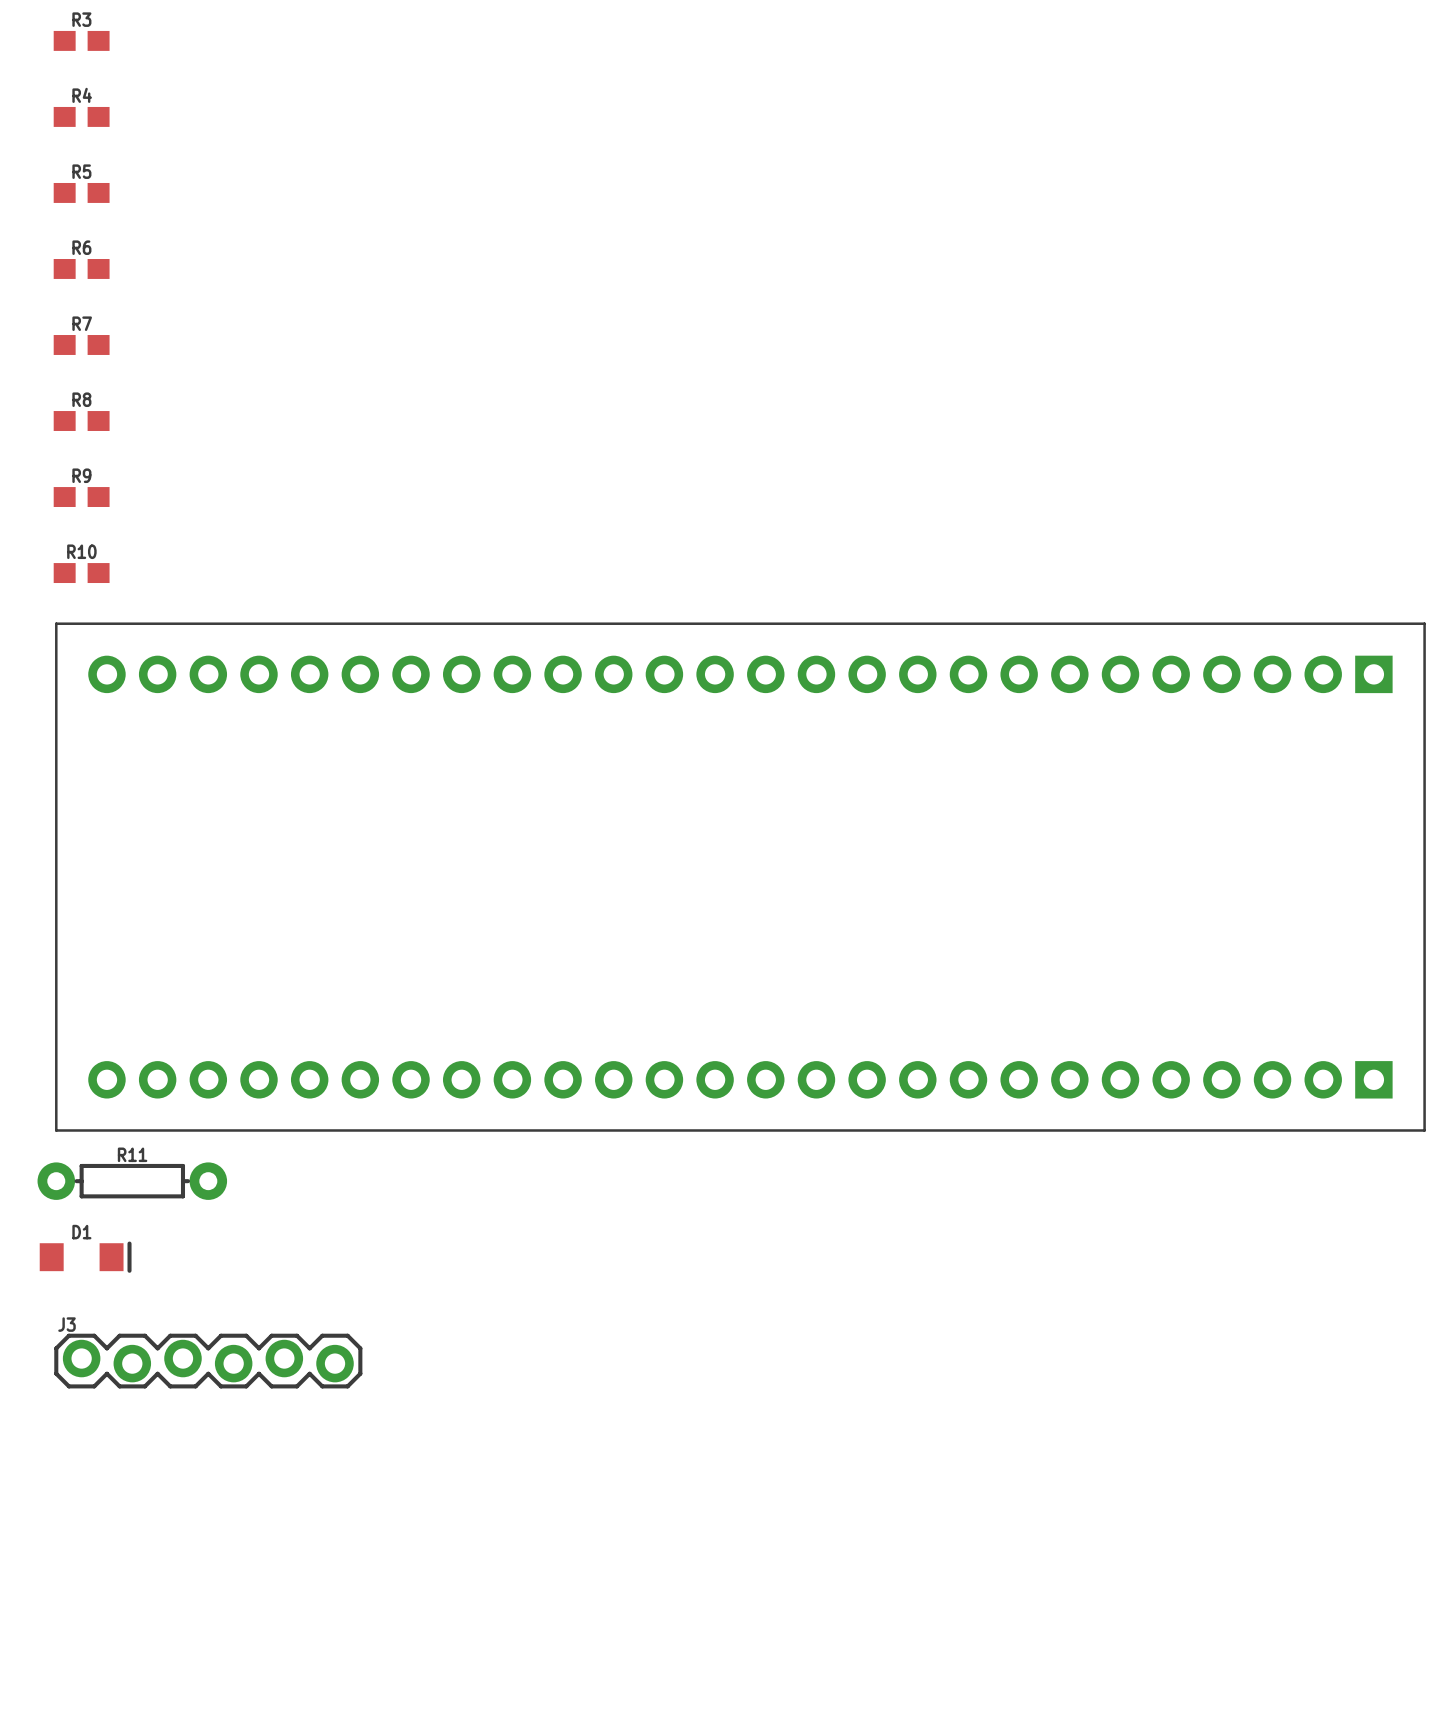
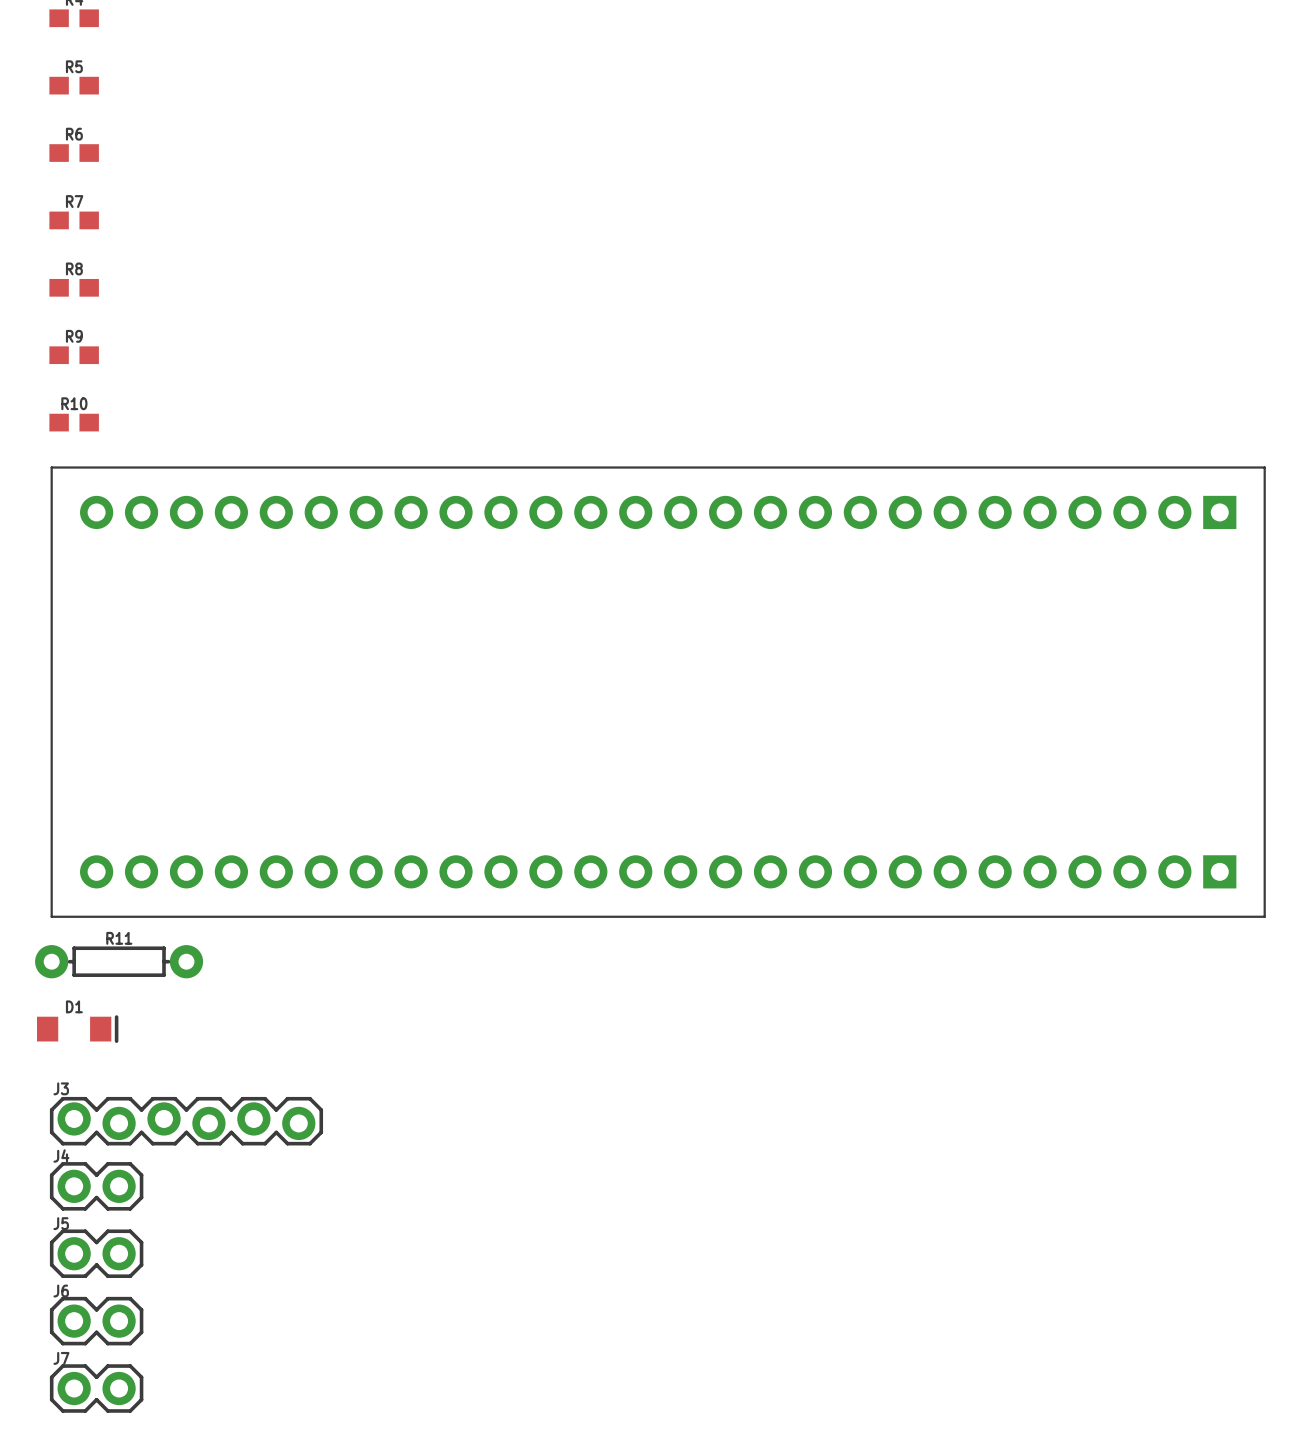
J4: none -> (96, 1186)
J5: none -> (96, 1253)
J6: none -> (96, 1321)
J7: none -> (96, 1388)

